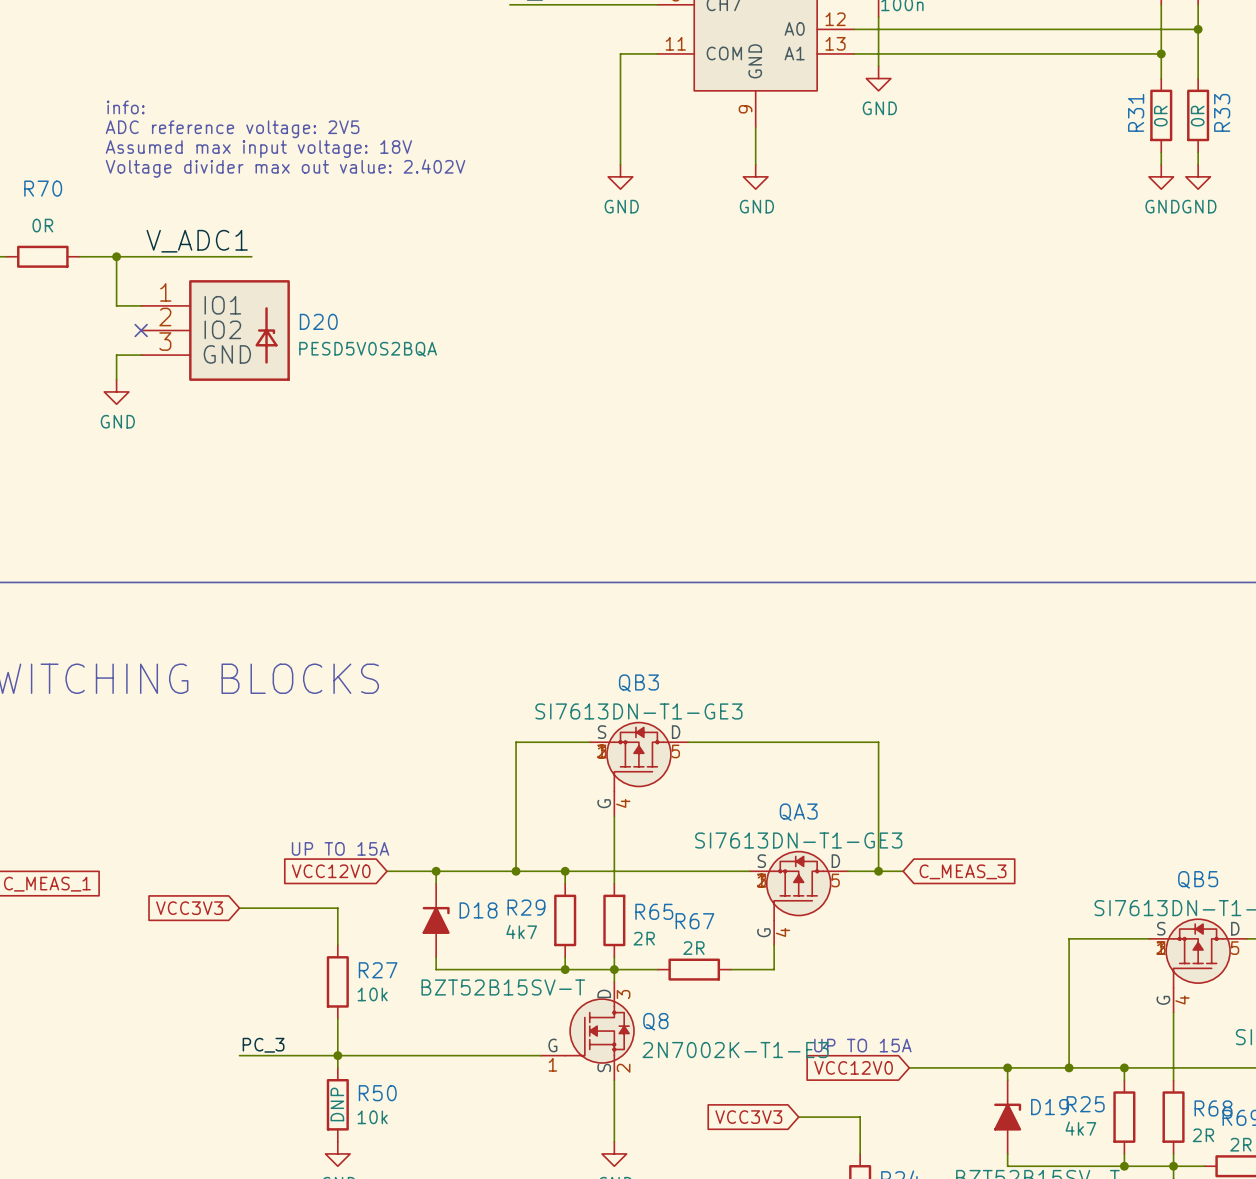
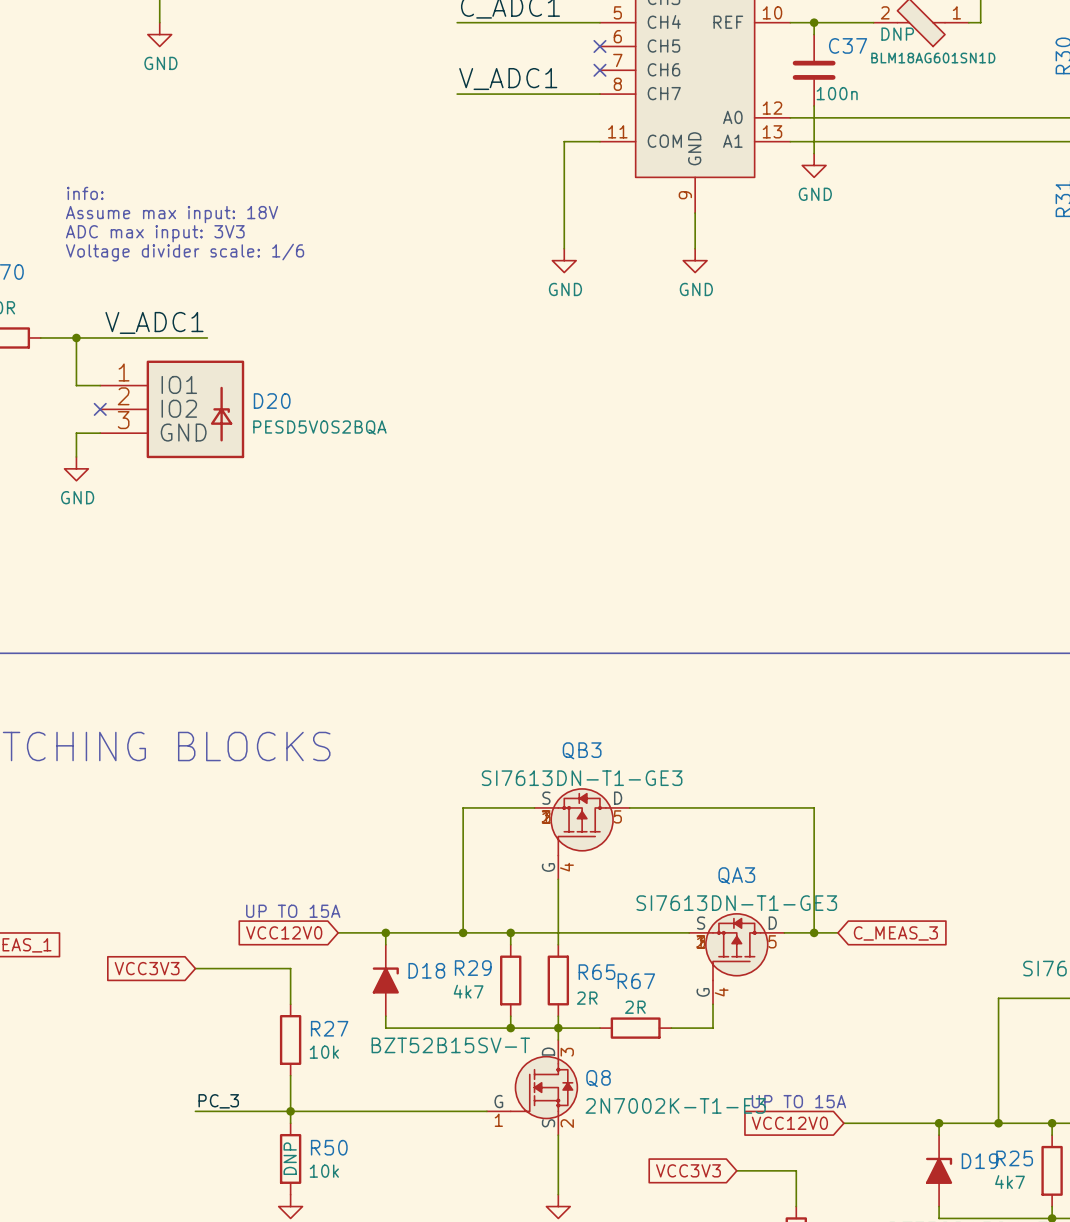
text: ADC reference voltage: 2V5 (232, 129) -> Assume max input: 18V (172, 214)
text: Assumed max input voltage: 18V (258, 149) -> ADC max input: 3V3 (155, 233)
text: Voltage divider max out value: 2.402V (285, 168) -> Voltage divider scale: 1/6 (185, 252)

